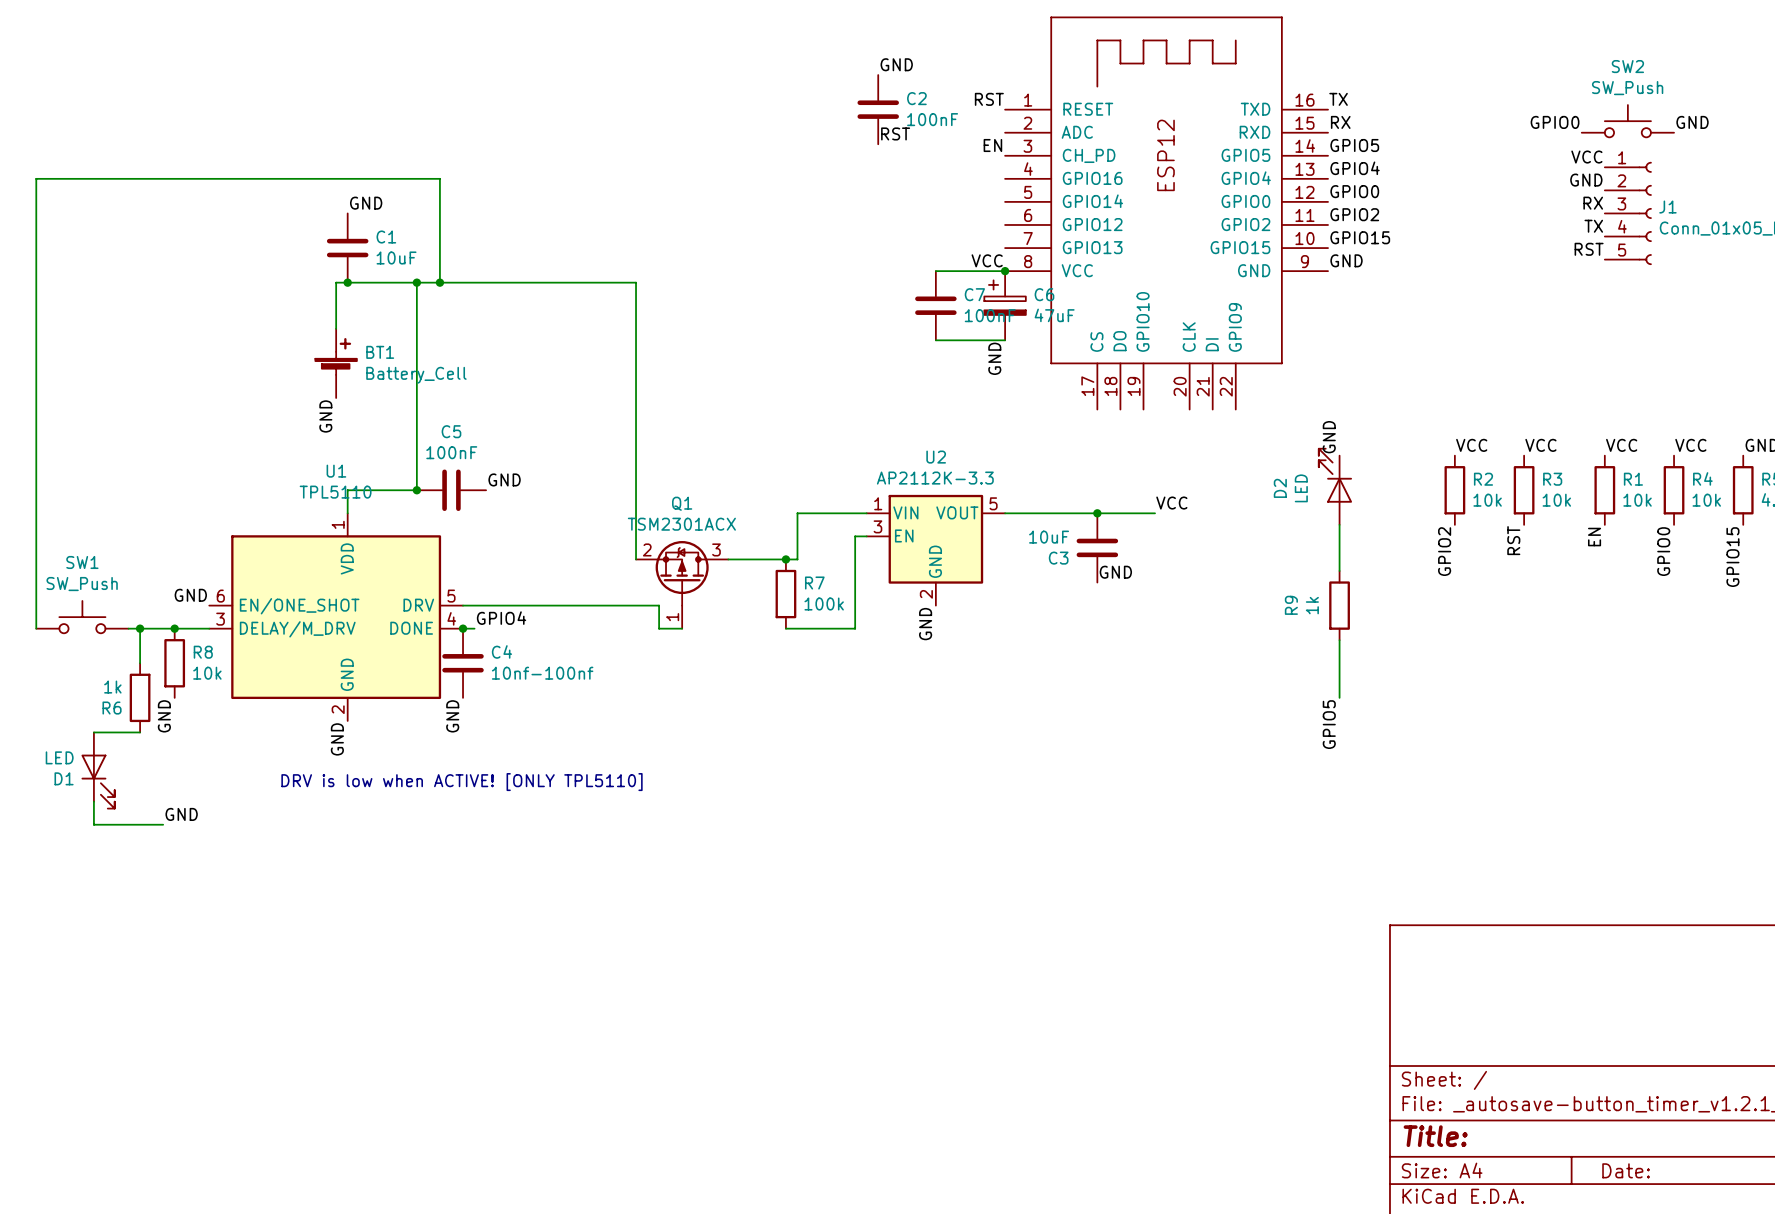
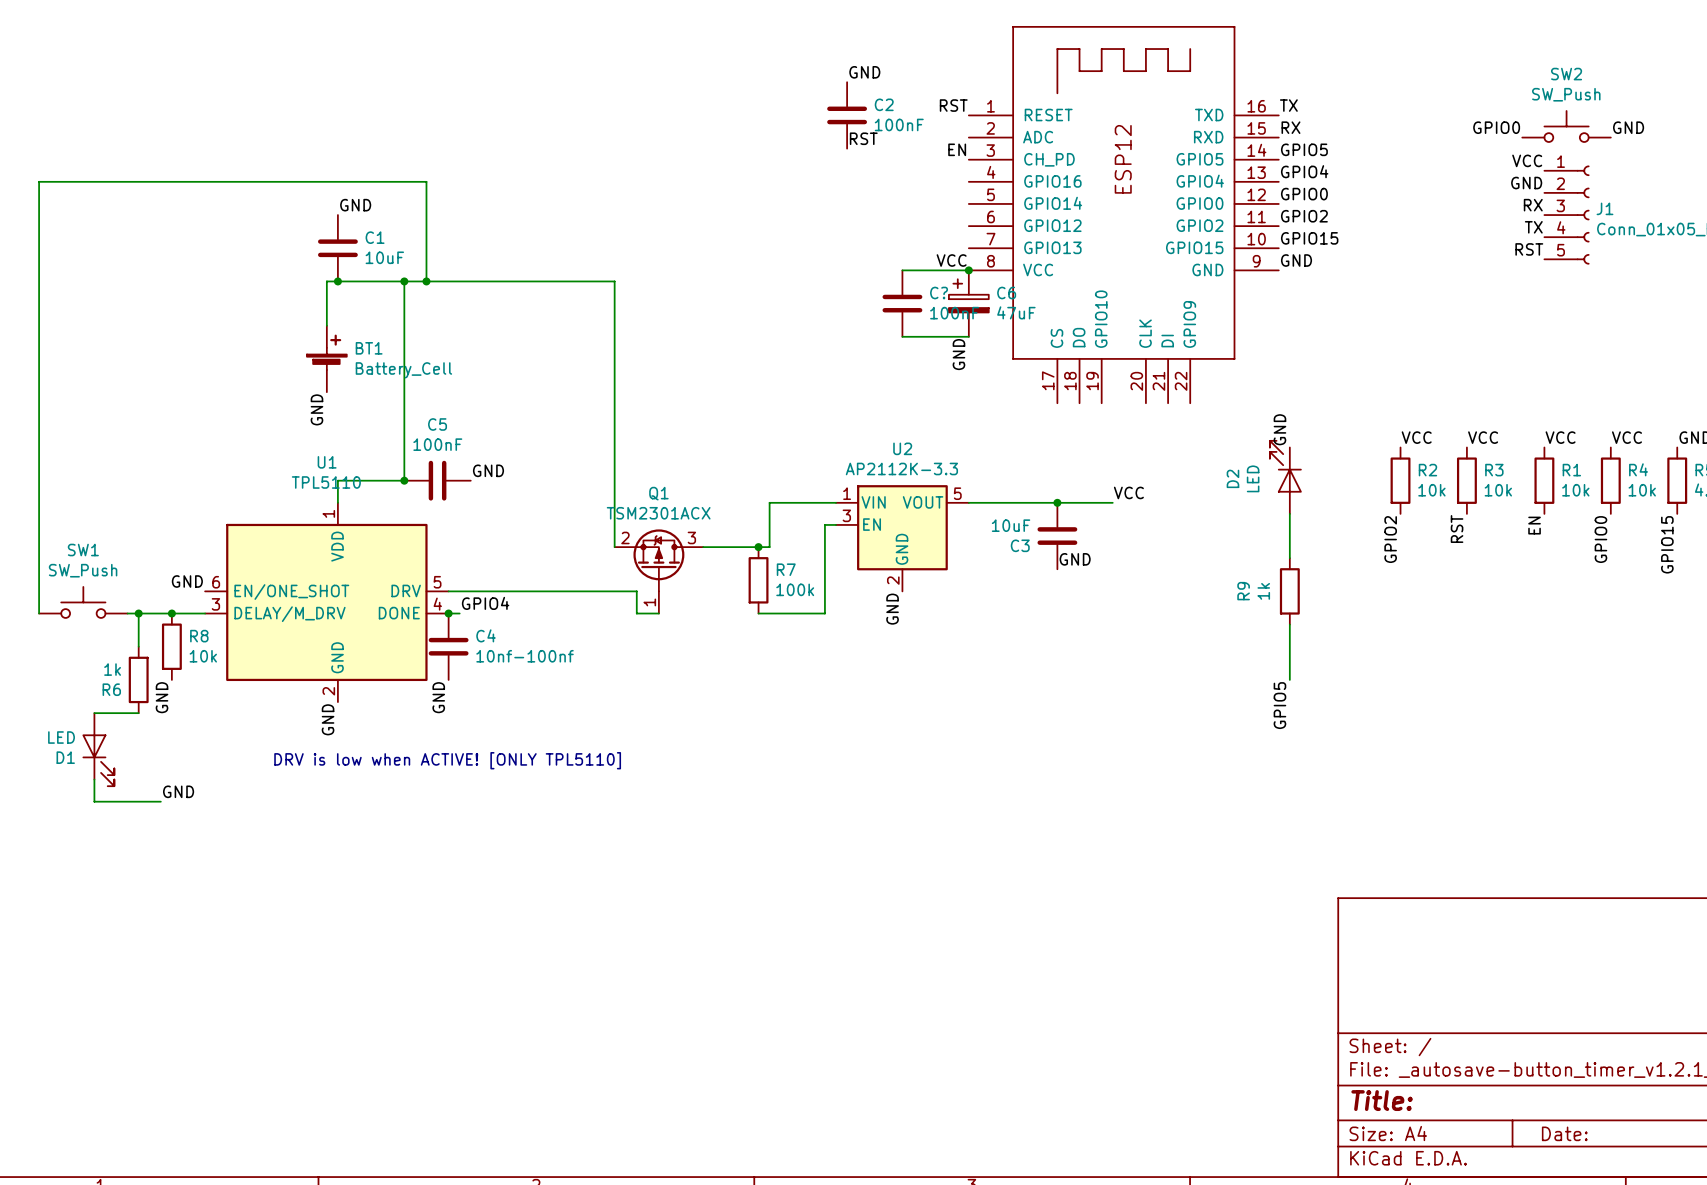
C7 name: C7 (974, 294) -> C? (939, 292)

